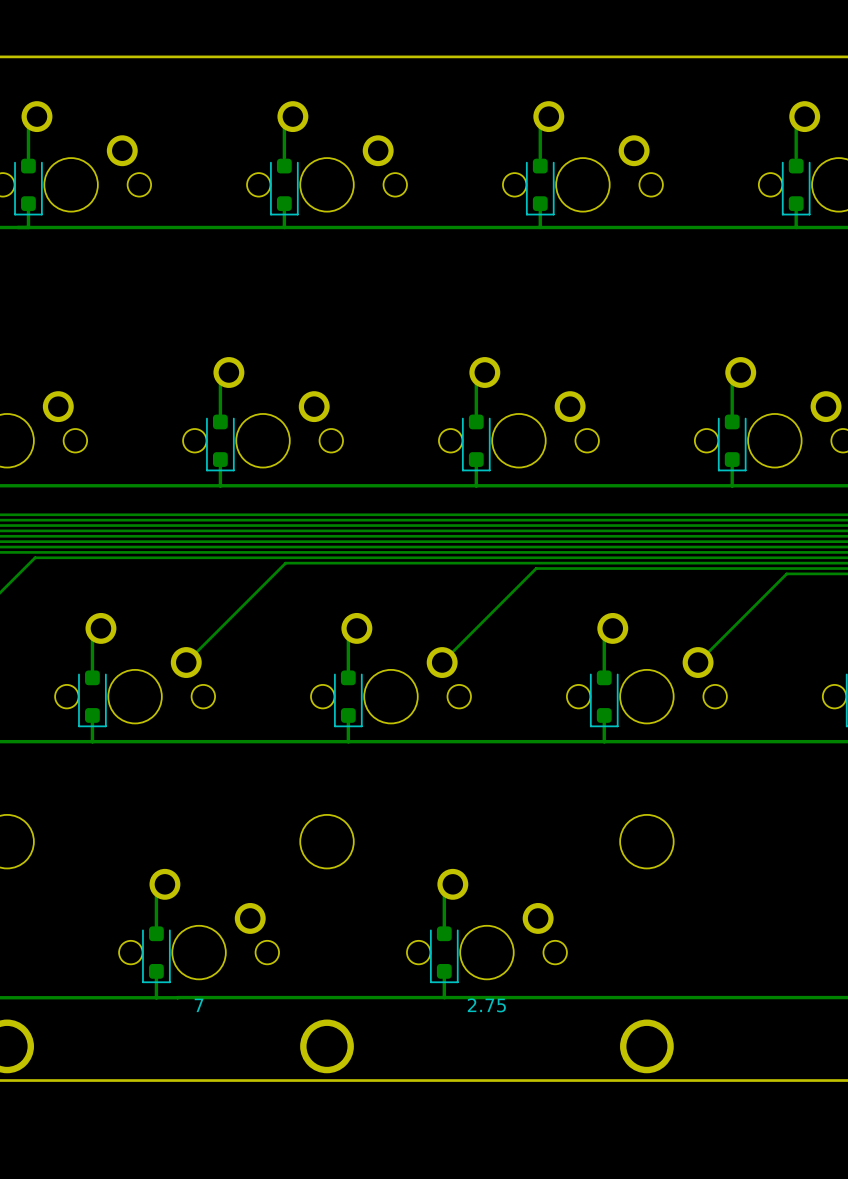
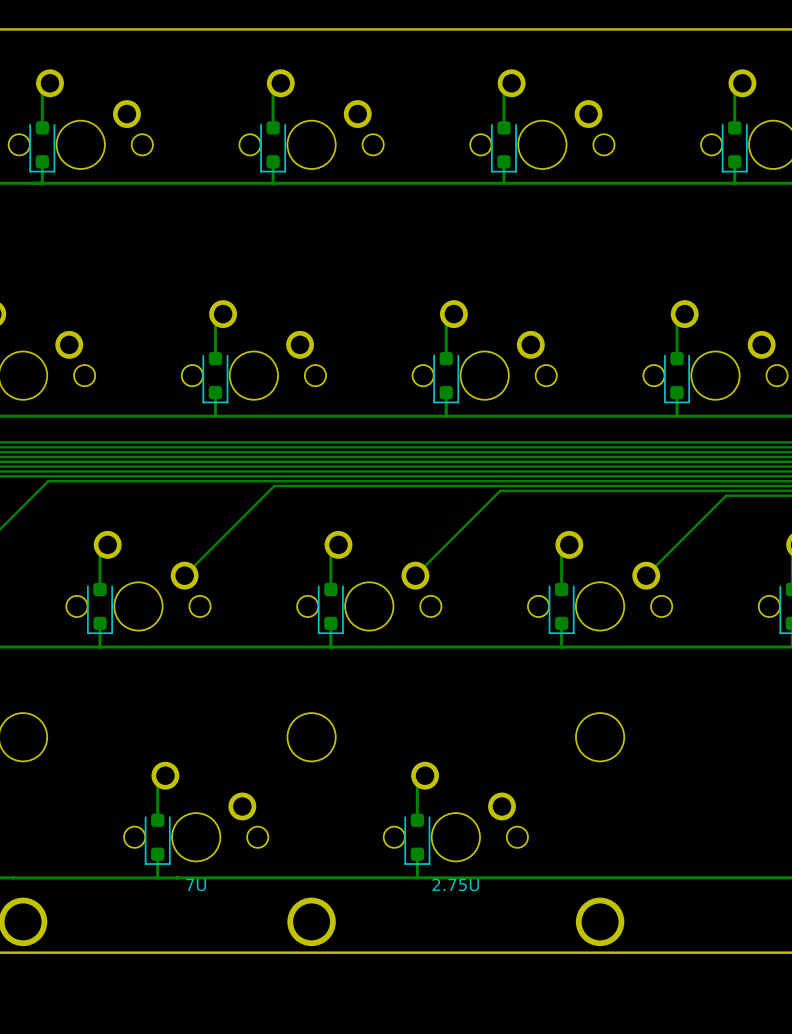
text: 7 (199, 1005) -> 7U (196, 884)
text: 2.75 (486, 1005) -> 2.75U (455, 884)

